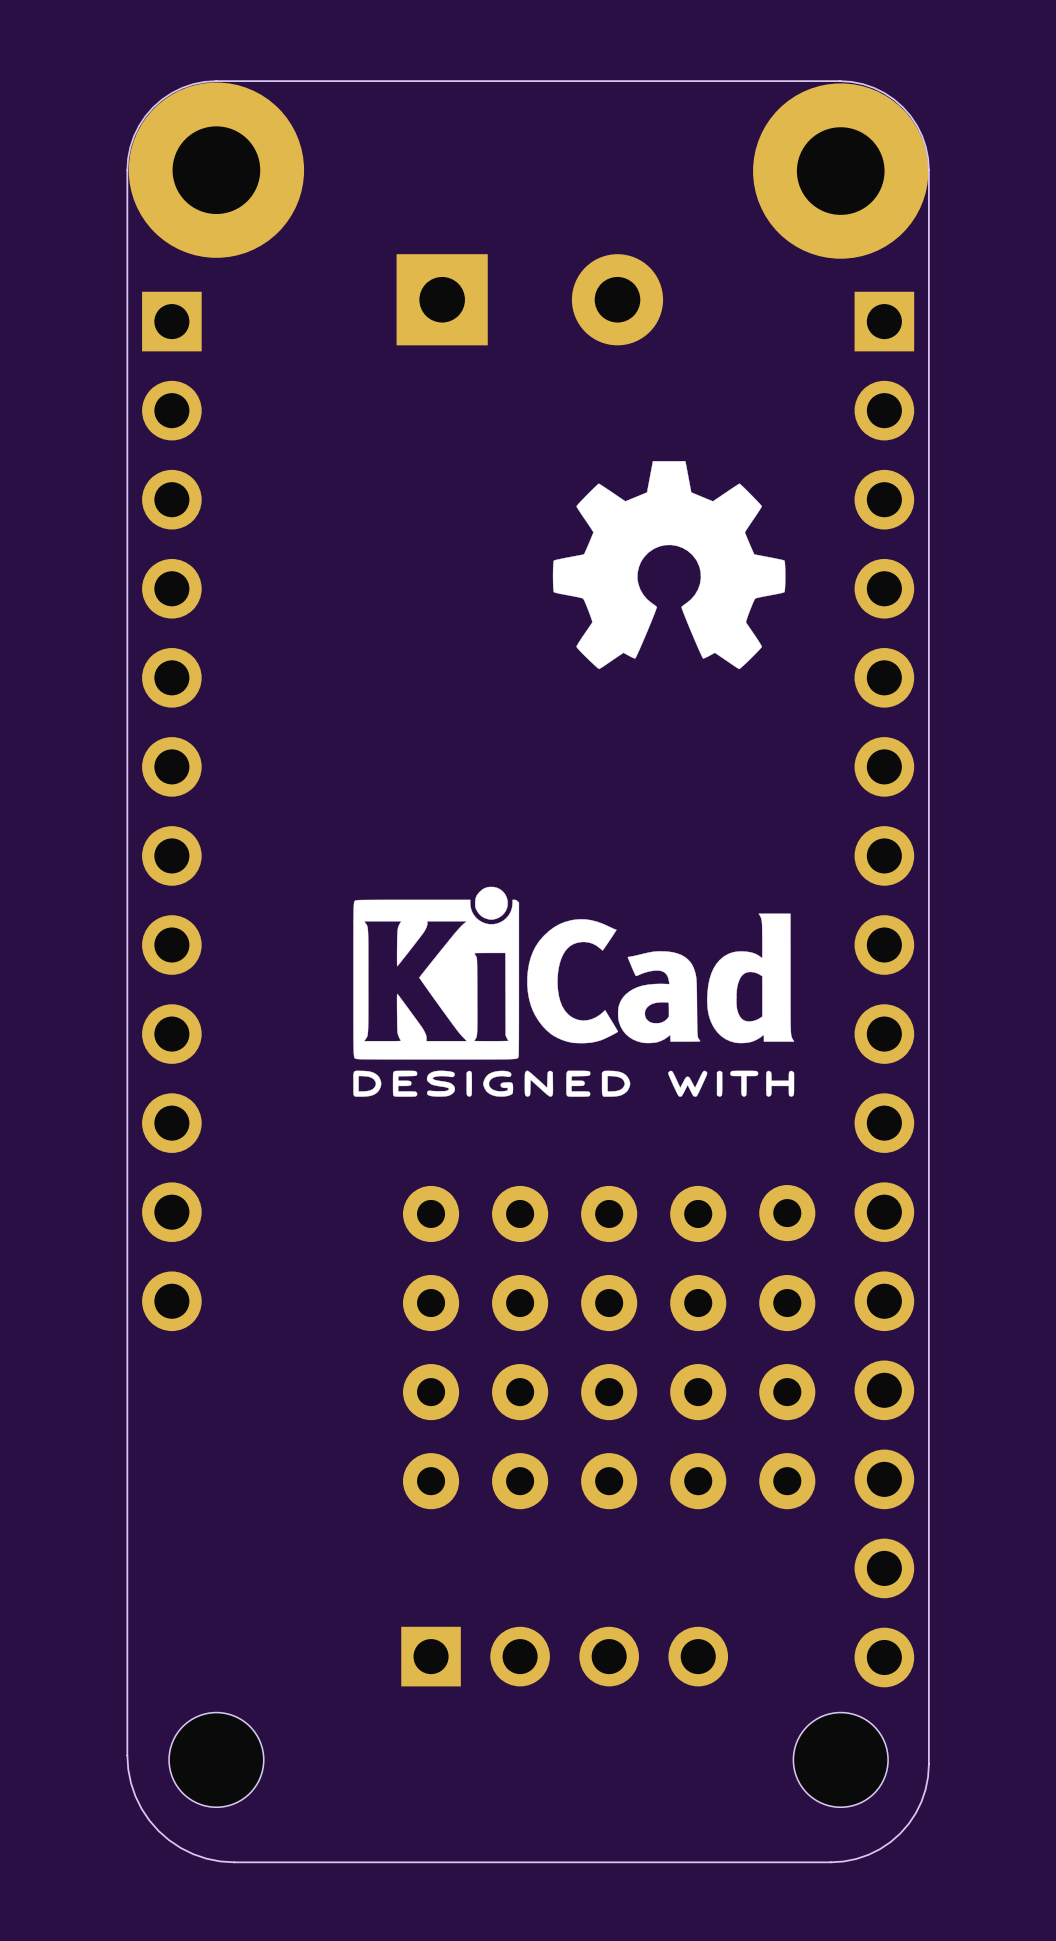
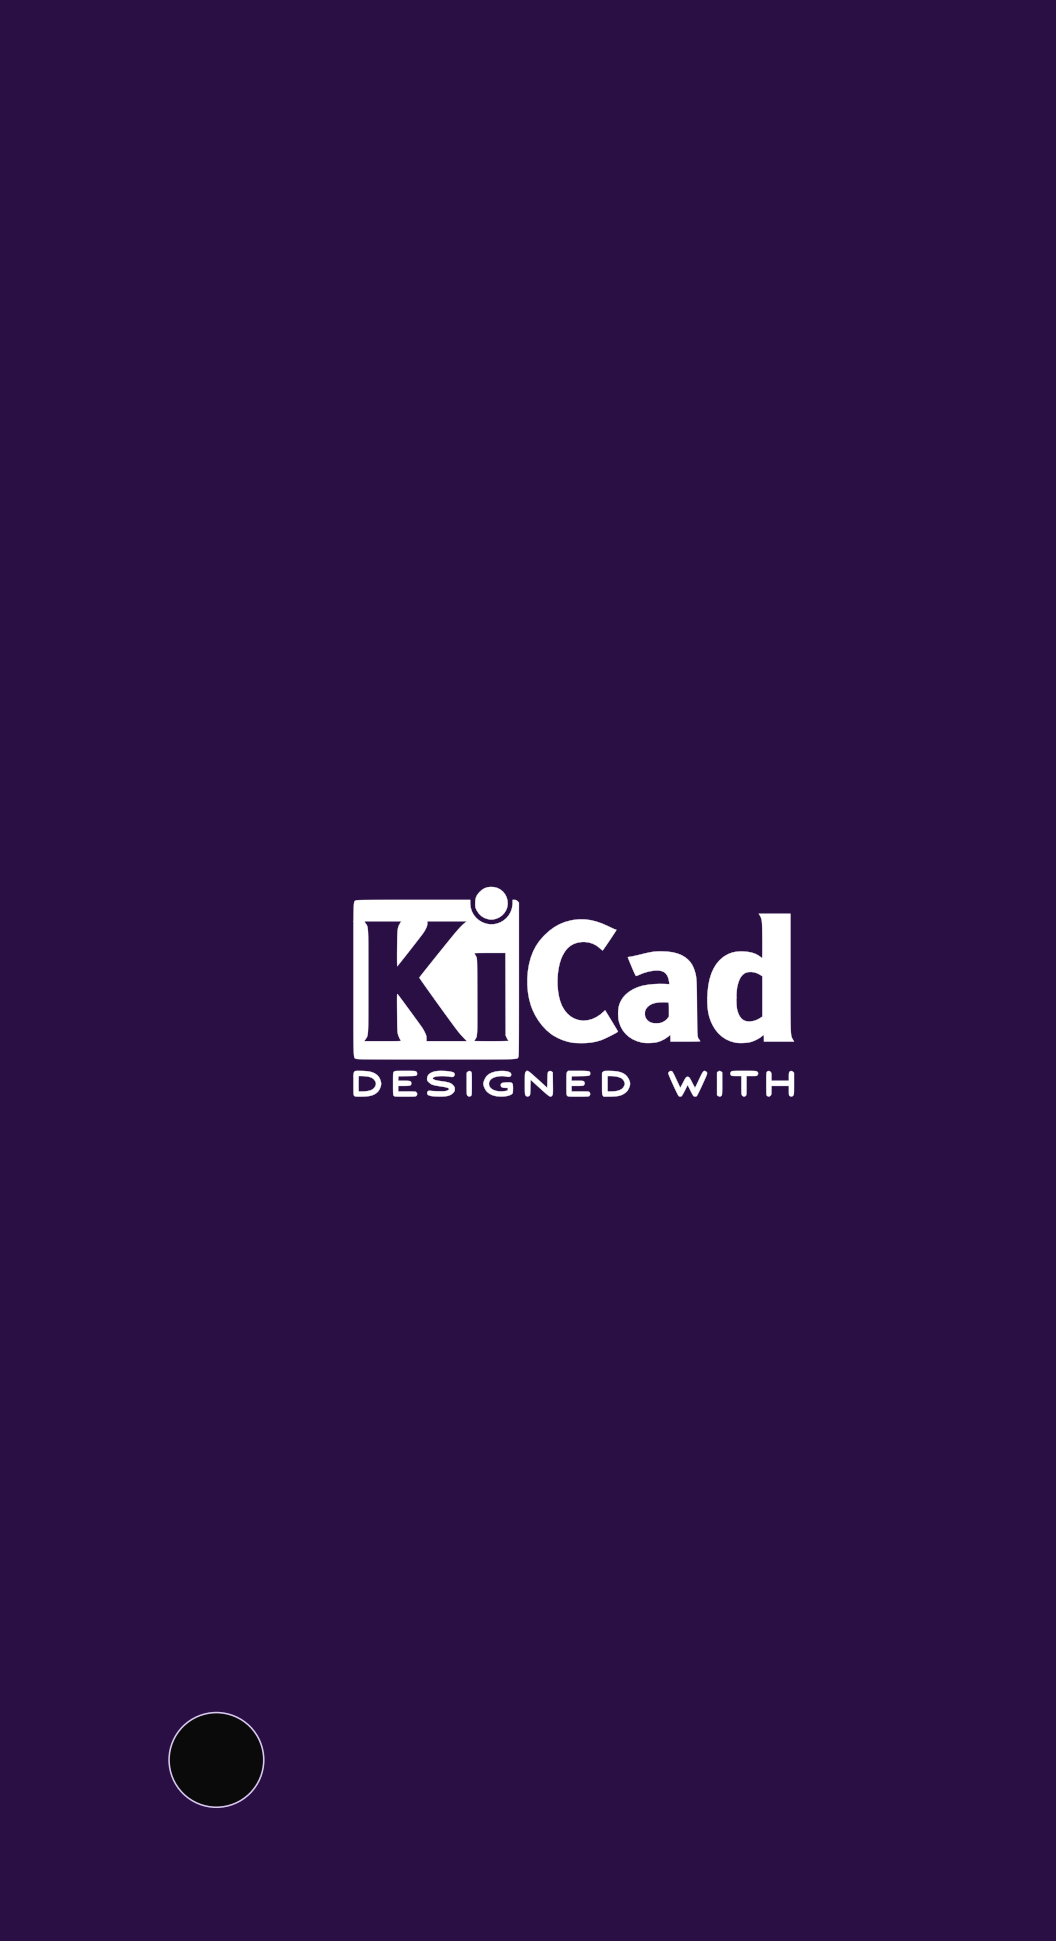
board edge: (839, 81) (204, 81) (182, 87) (162, 99) (145, 115) (134, 136) (128, 158) (127, 170) (127, 1755) (130, 1783) (135, 1796) (149, 1820) (169, 1840) (193, 1854) (220, 1861) (234, 1862) (843, 1861) (868, 1854) (890, 1842) (908, 1824) (921, 1801) (928, 1777) (928, 1764) (928, 170) (928, 158) (922, 136) (916, 125) (902, 107) (884, 93) (873, 87) (851, 81) (839, 81) -> none
part: (216, 170) -> none
part: (840, 171) -> none
part: (529, 299) -> none
drawing: [552, 461, 786, 670] -> none
part: (171, 811) -> none
part: (884, 989) -> none
part: (609, 1347) -> none
part: (564, 1656) -> none
part: (840, 1759) -> none

